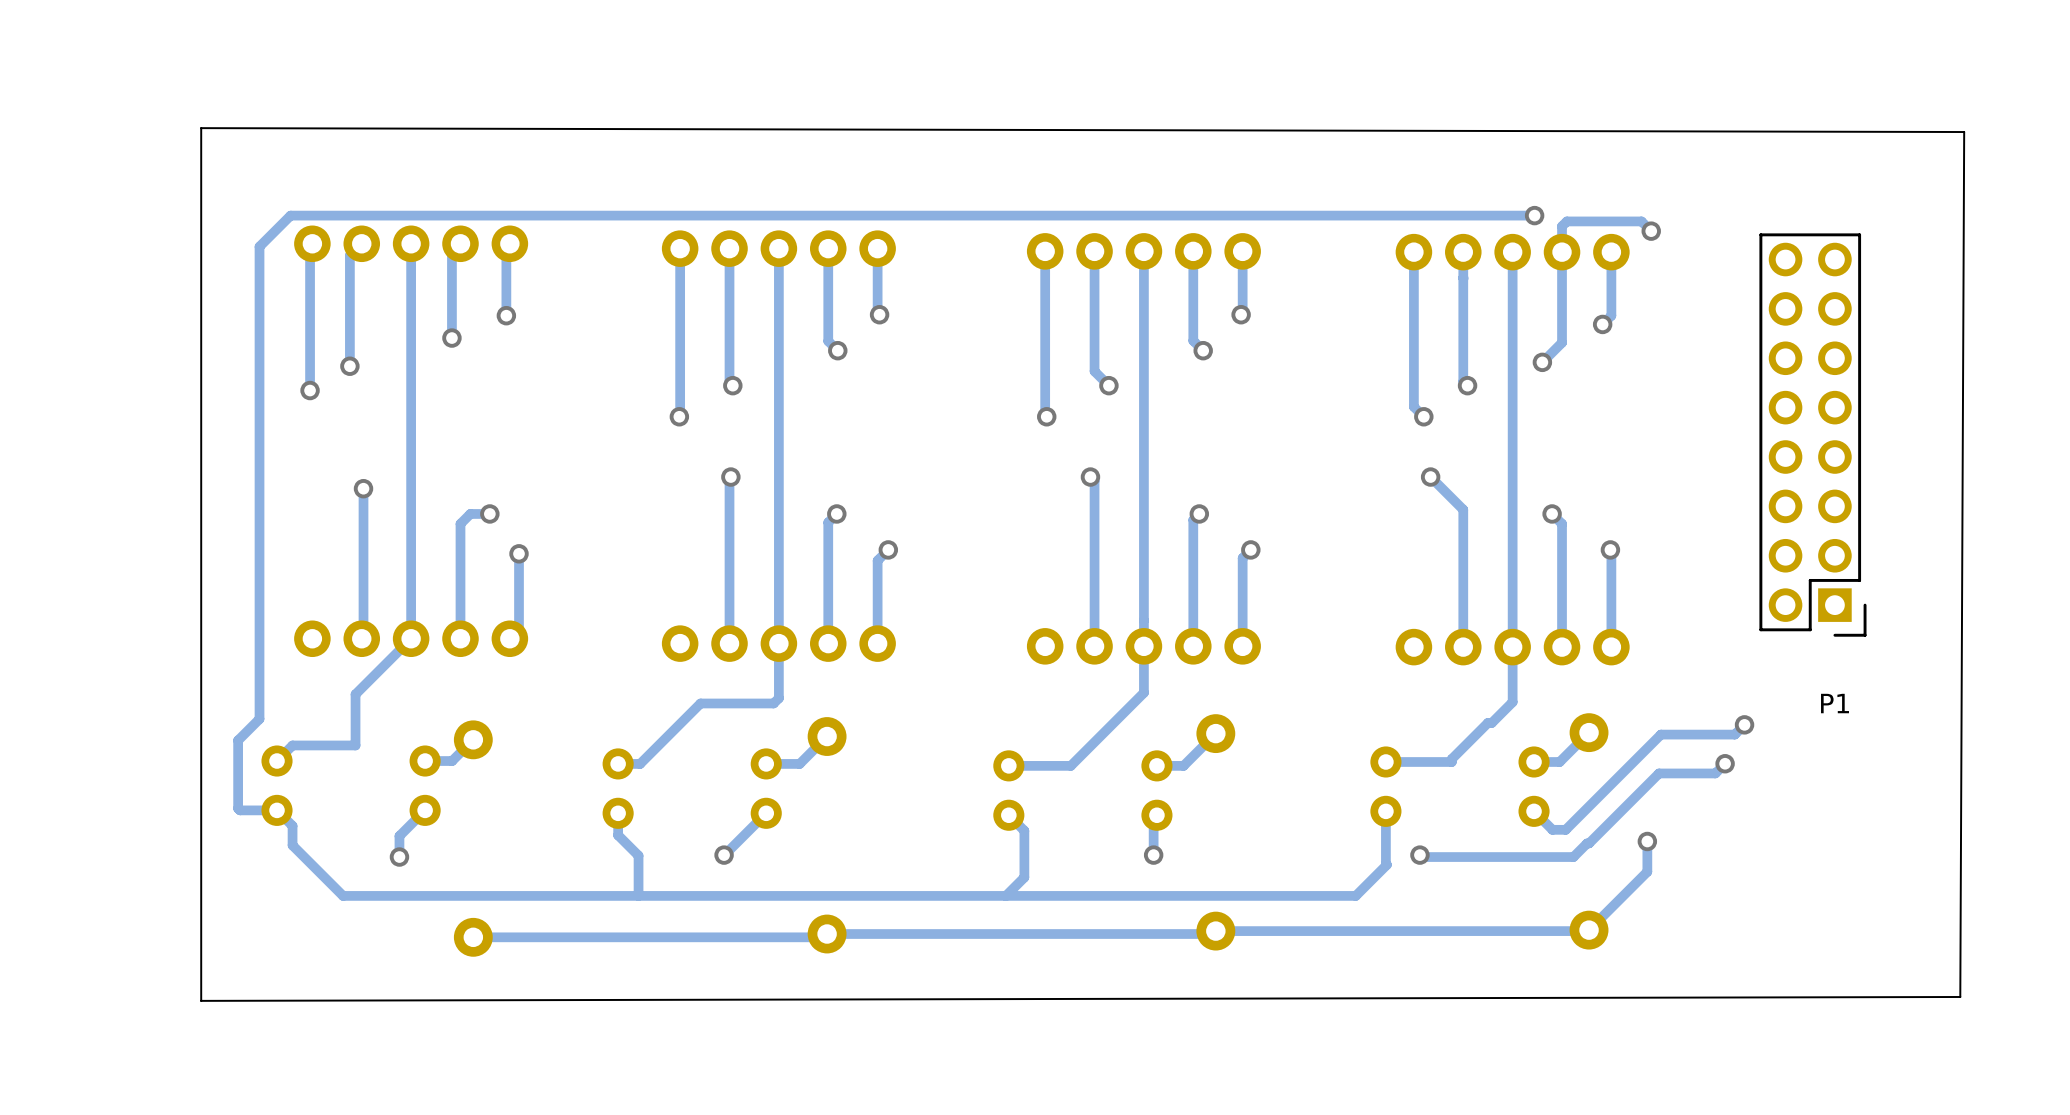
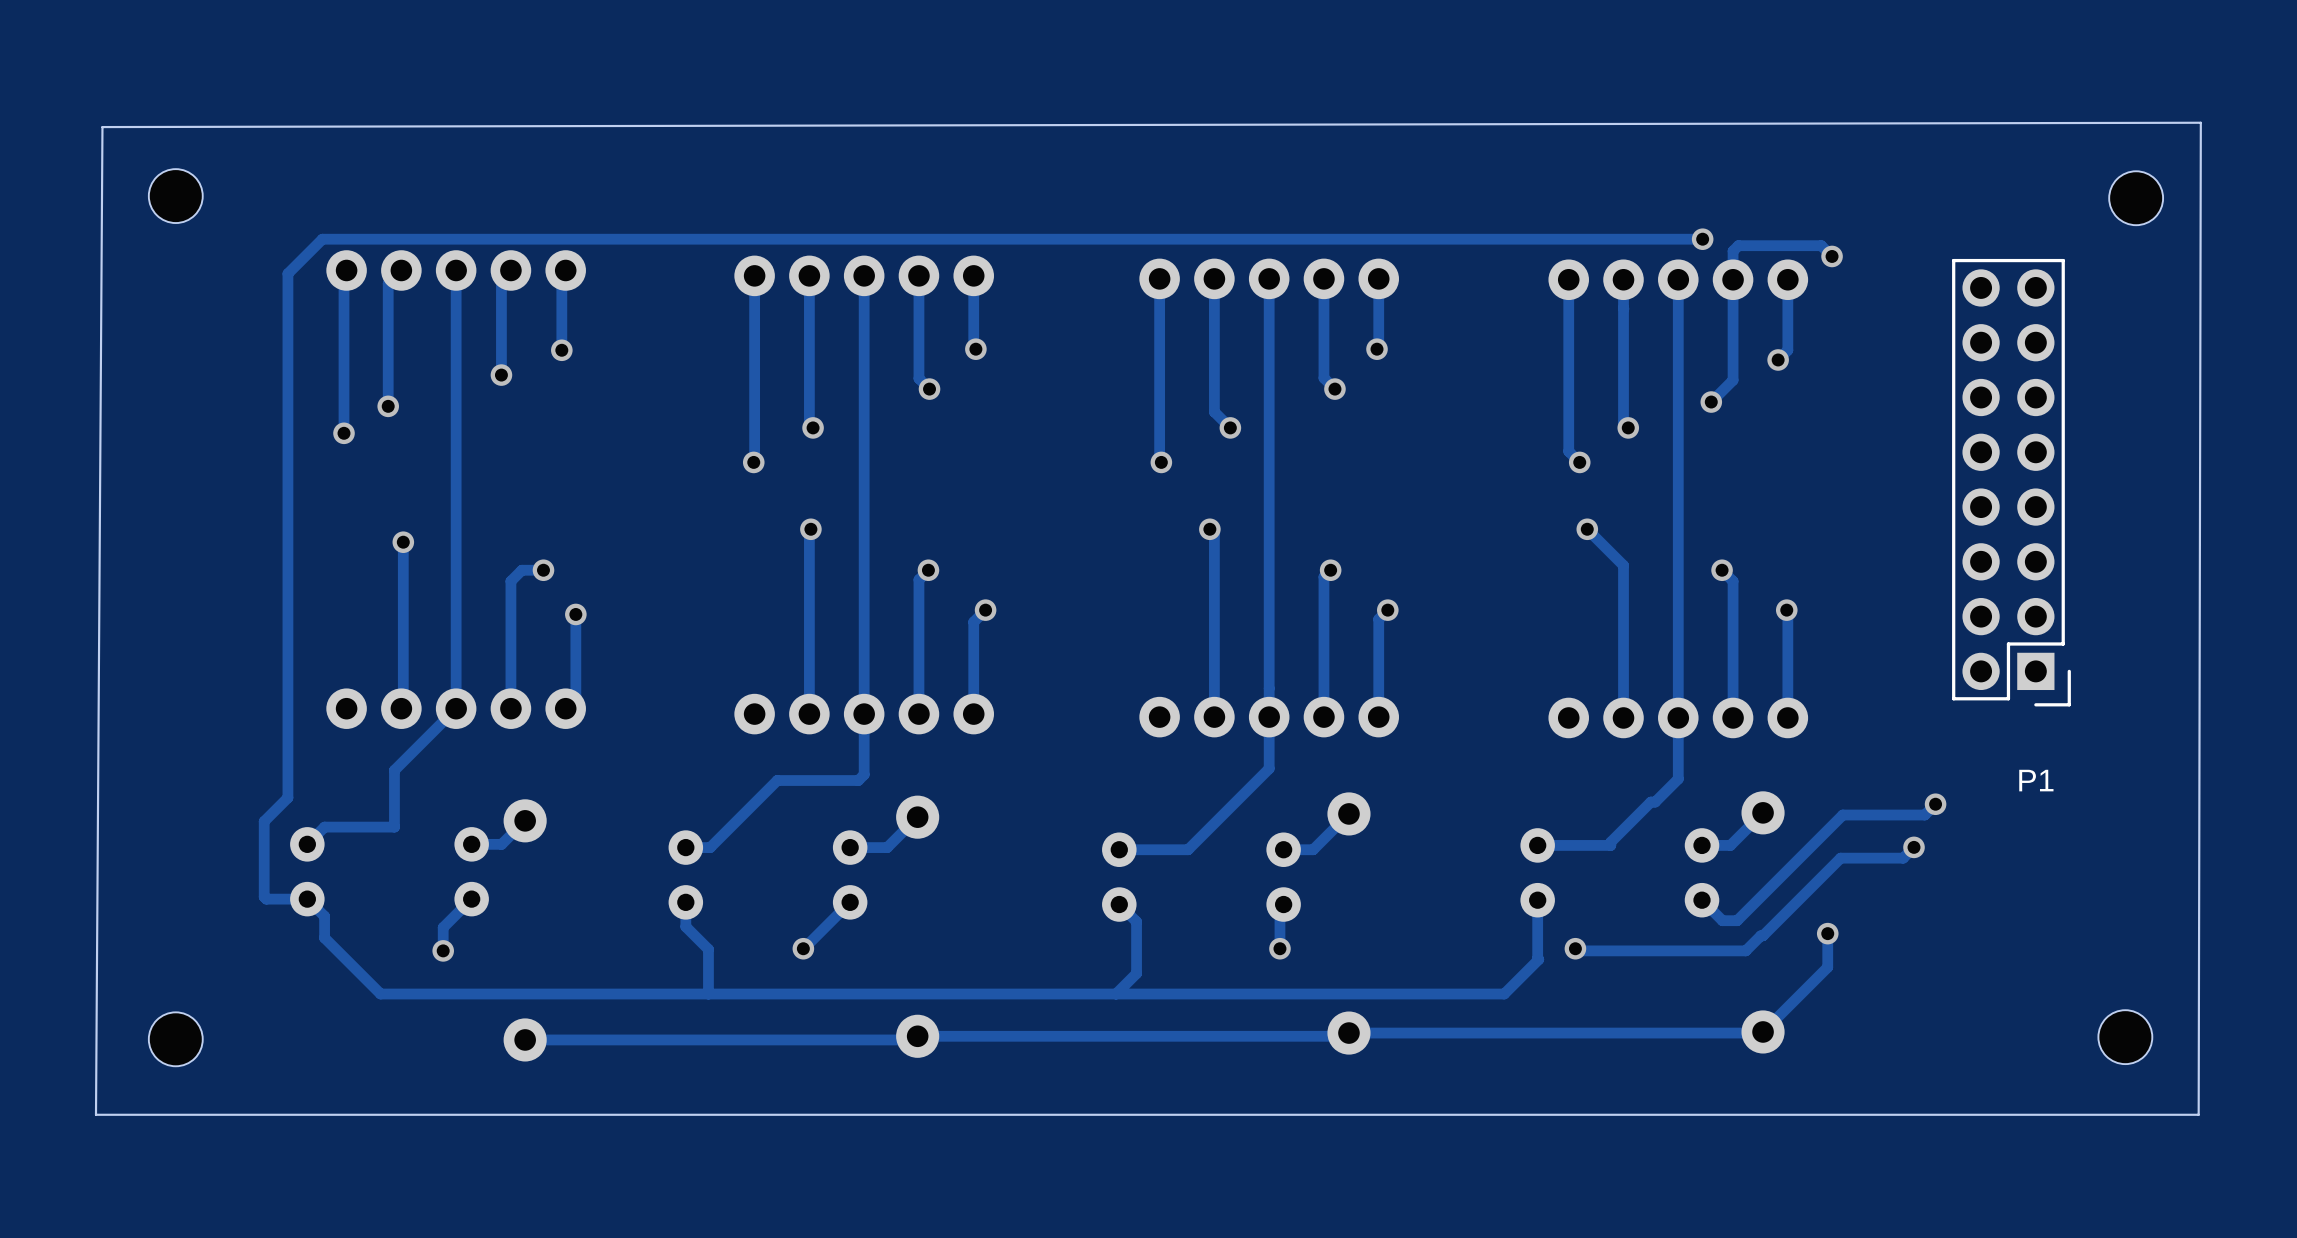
board edge: (201, 128) (201, 1000) (1960, 996) (1964, 132) (201, 128) -> (2200, 122) (2198, 1114) (95, 1114) (102, 127) (2200, 122)
part: none -> (175, 196)
part: none -> (2136, 198)
part: none -> (2125, 1037)
part: none -> (175, 1039)

